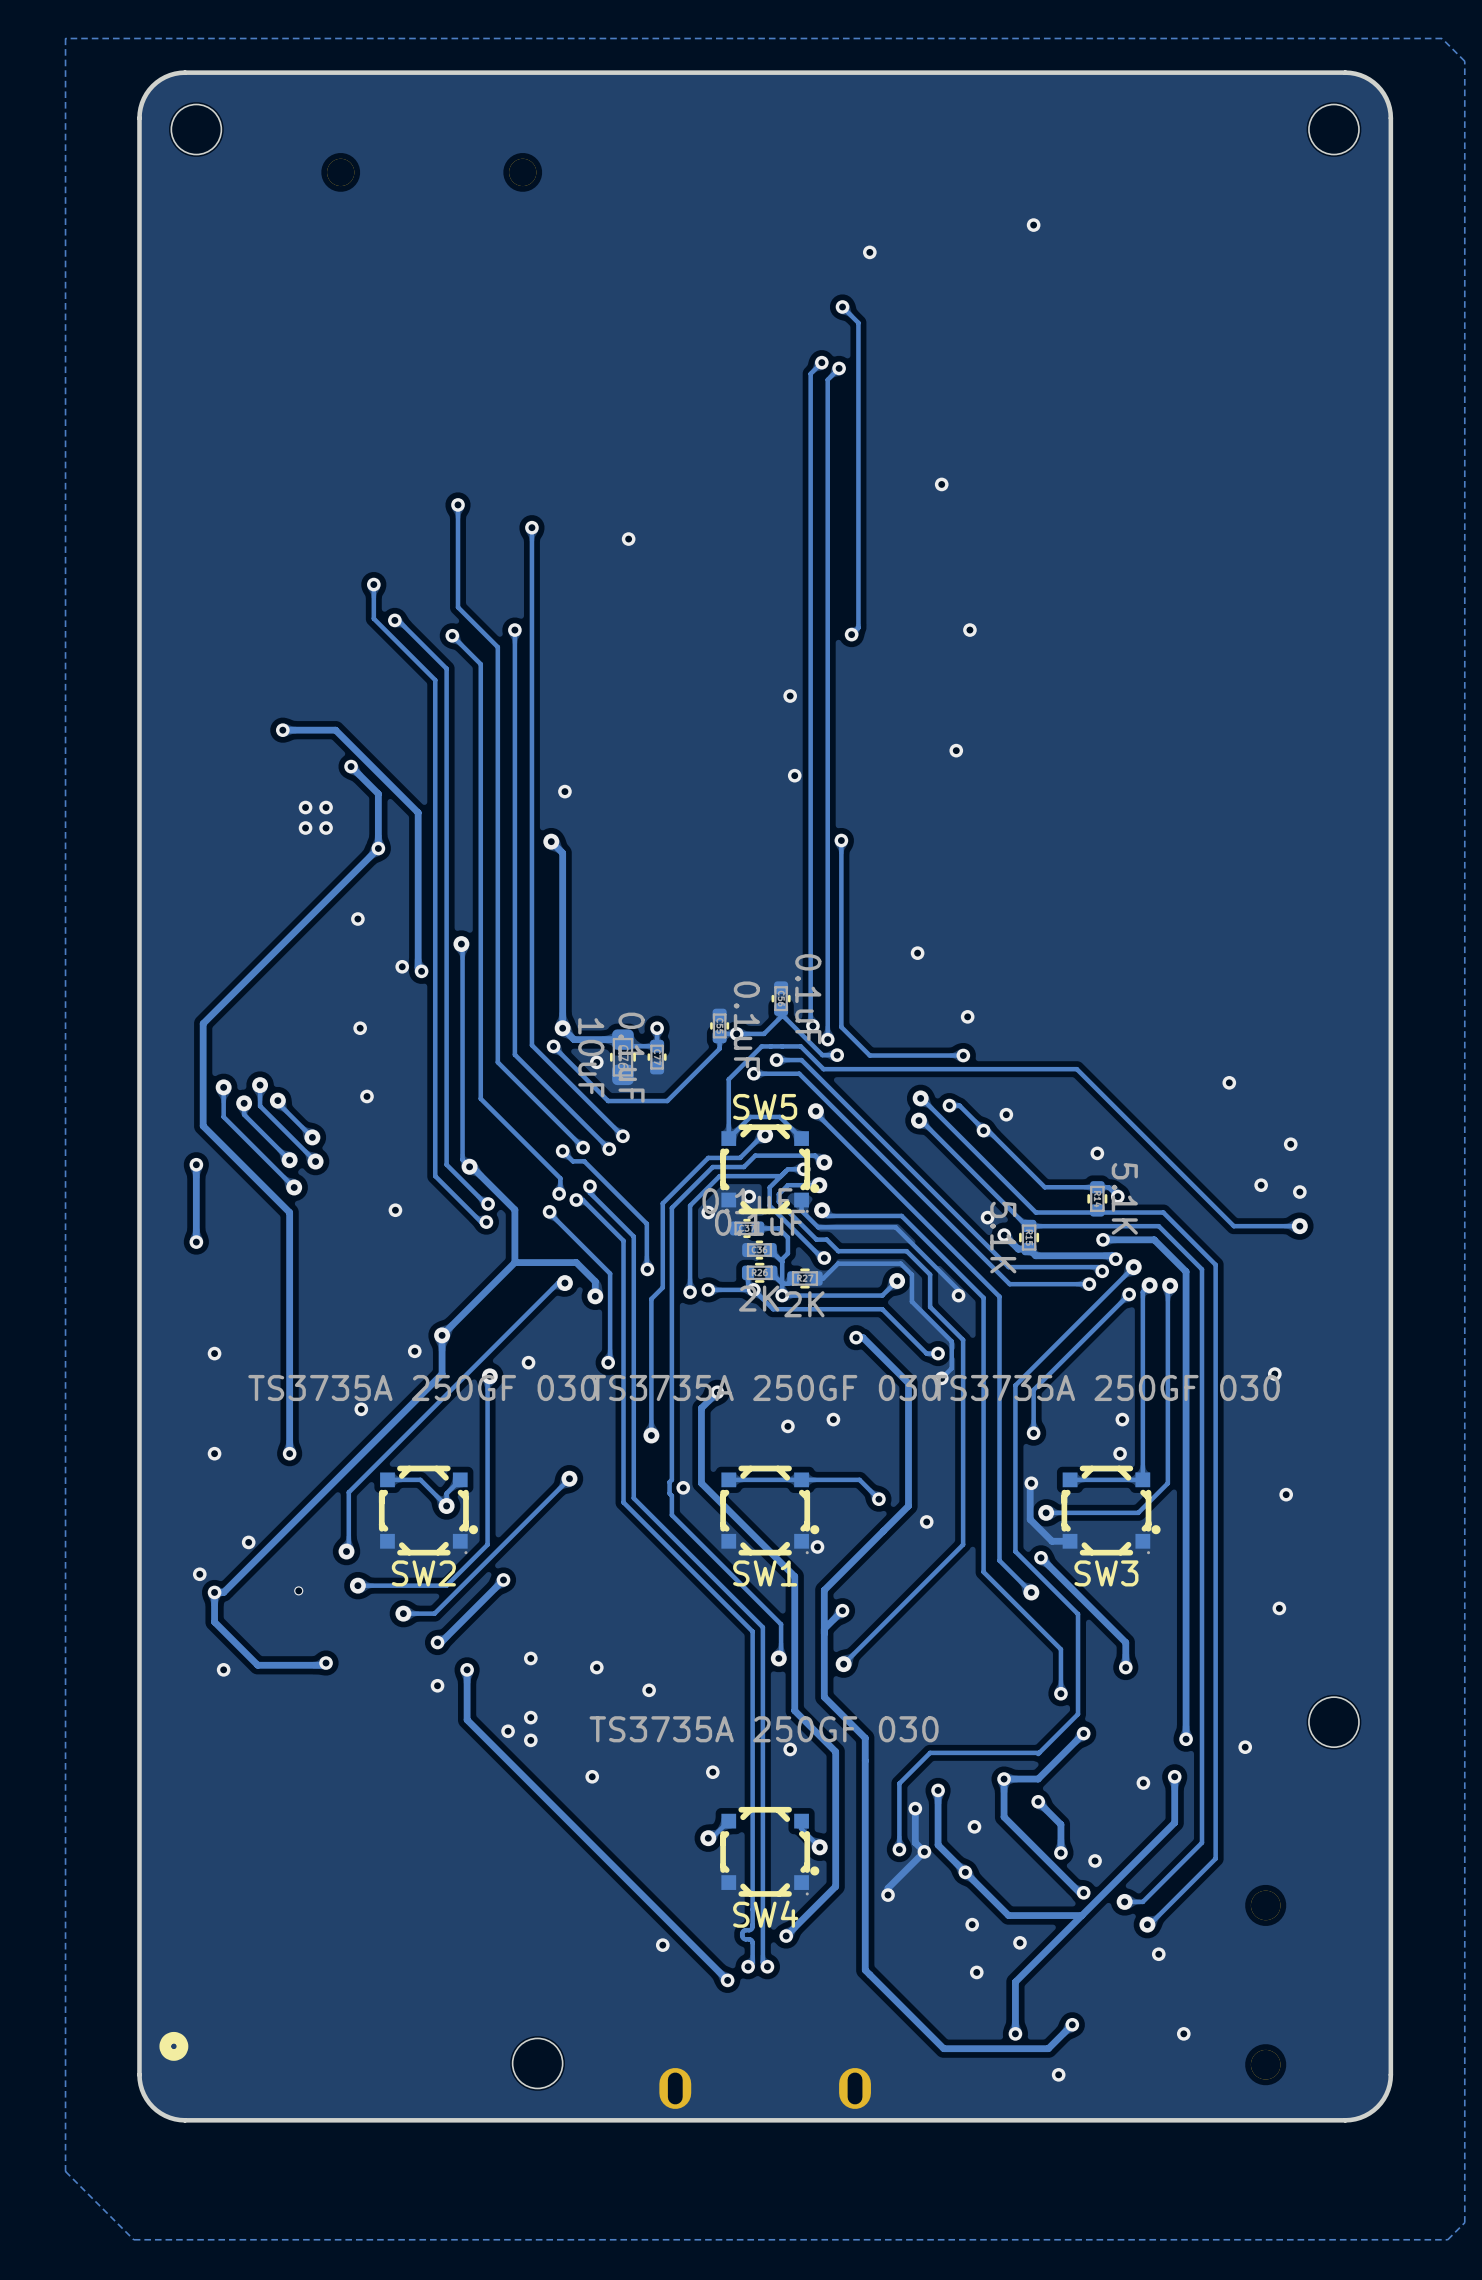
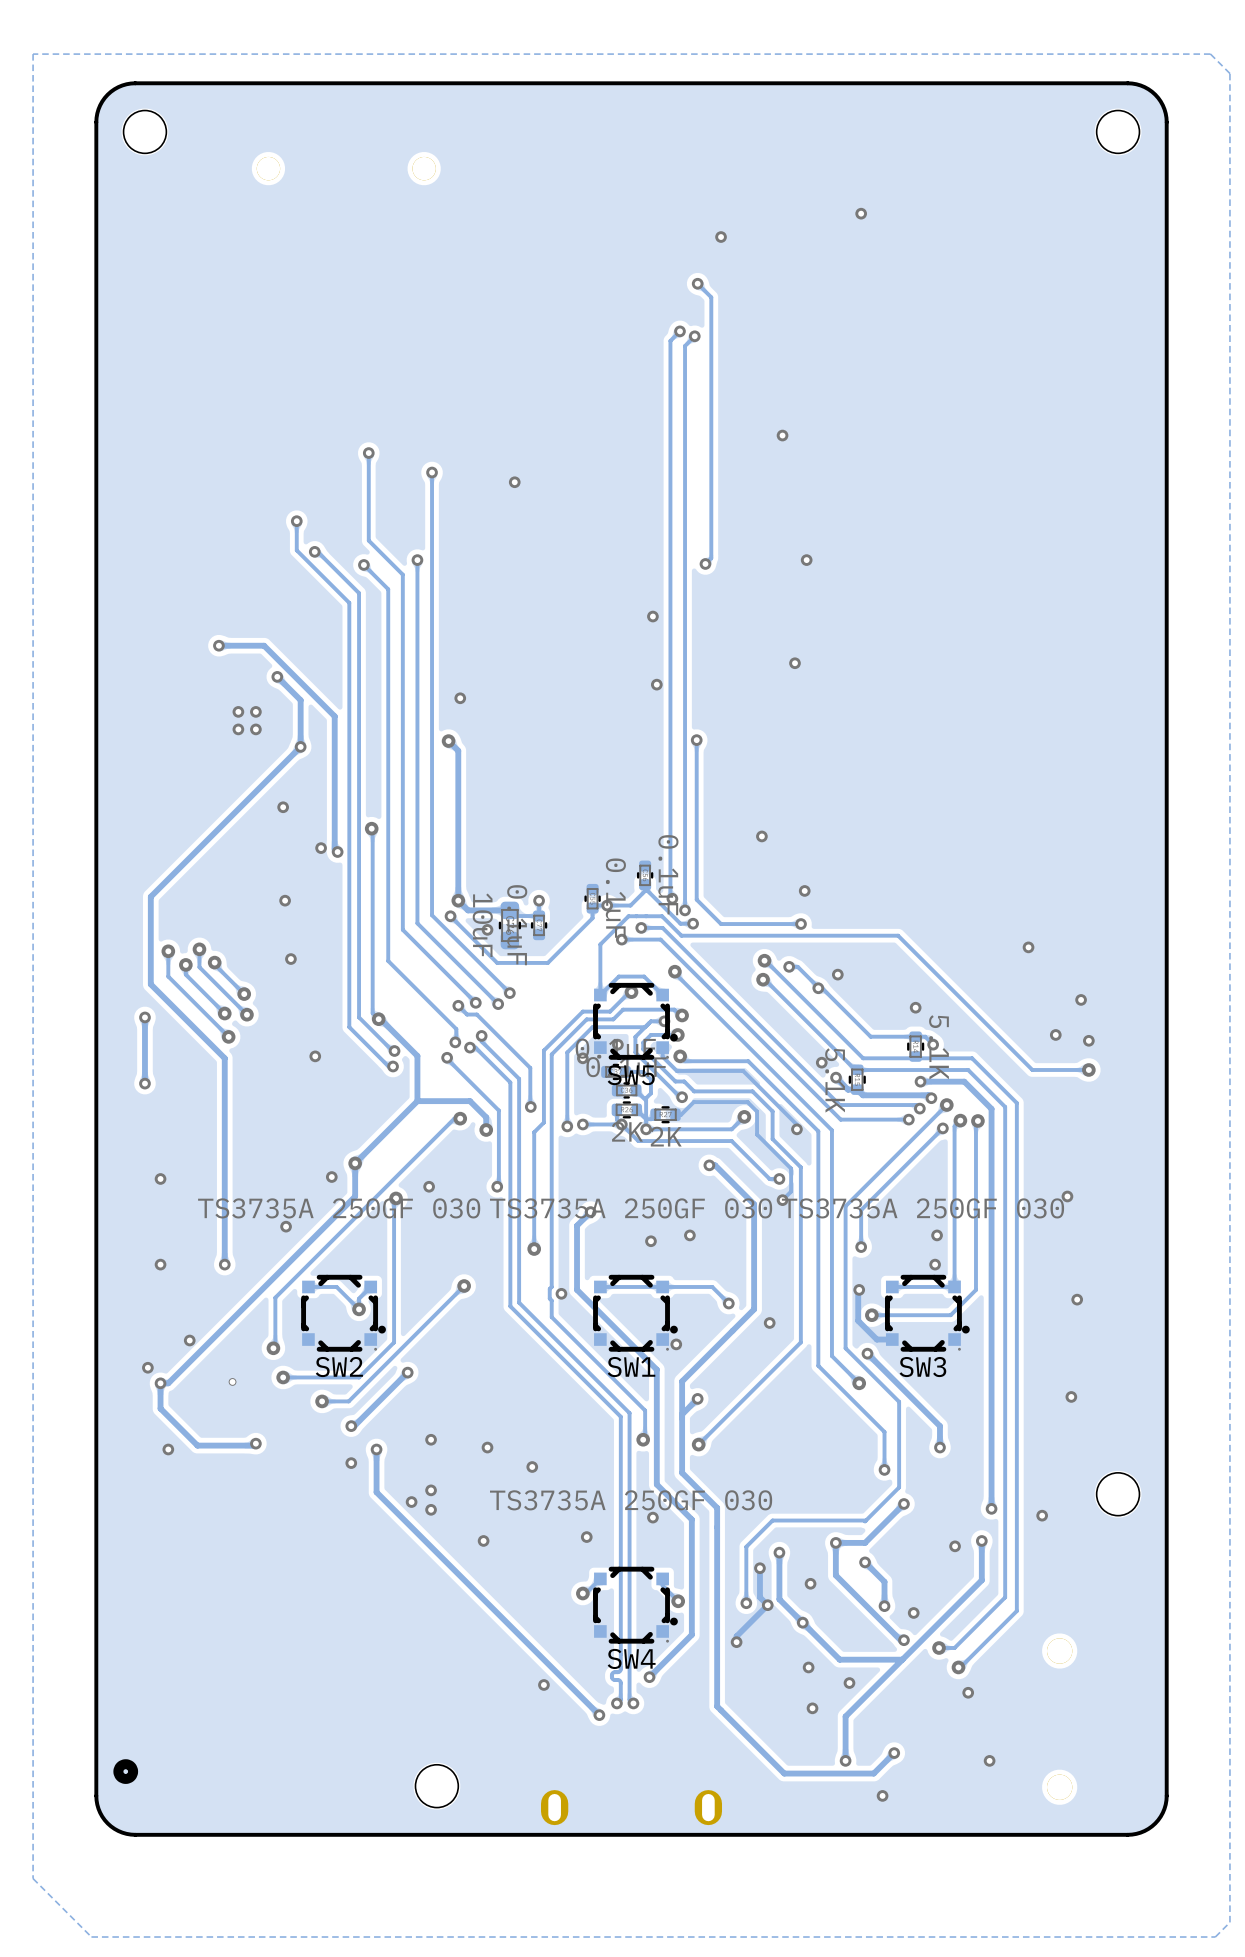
SW5 name position: SW5 (765, 1107) -> SW5 (631, 1075)

